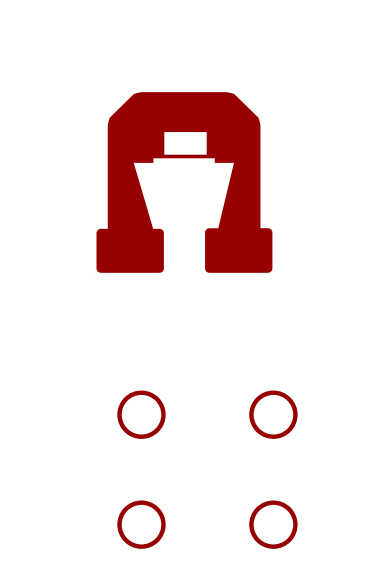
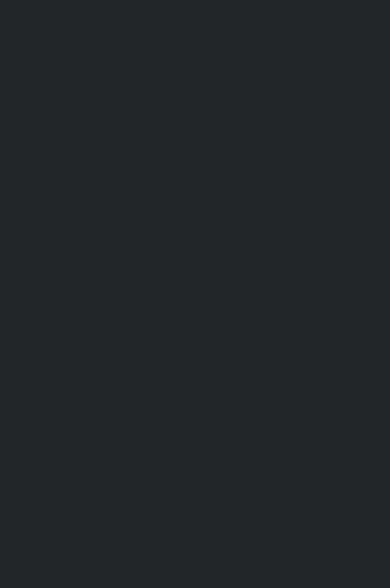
part: (184, 182) -> none
part: (141, 414) -> none
part: (273, 414) -> none
part: (141, 524) -> none
part: (273, 524) -> none

